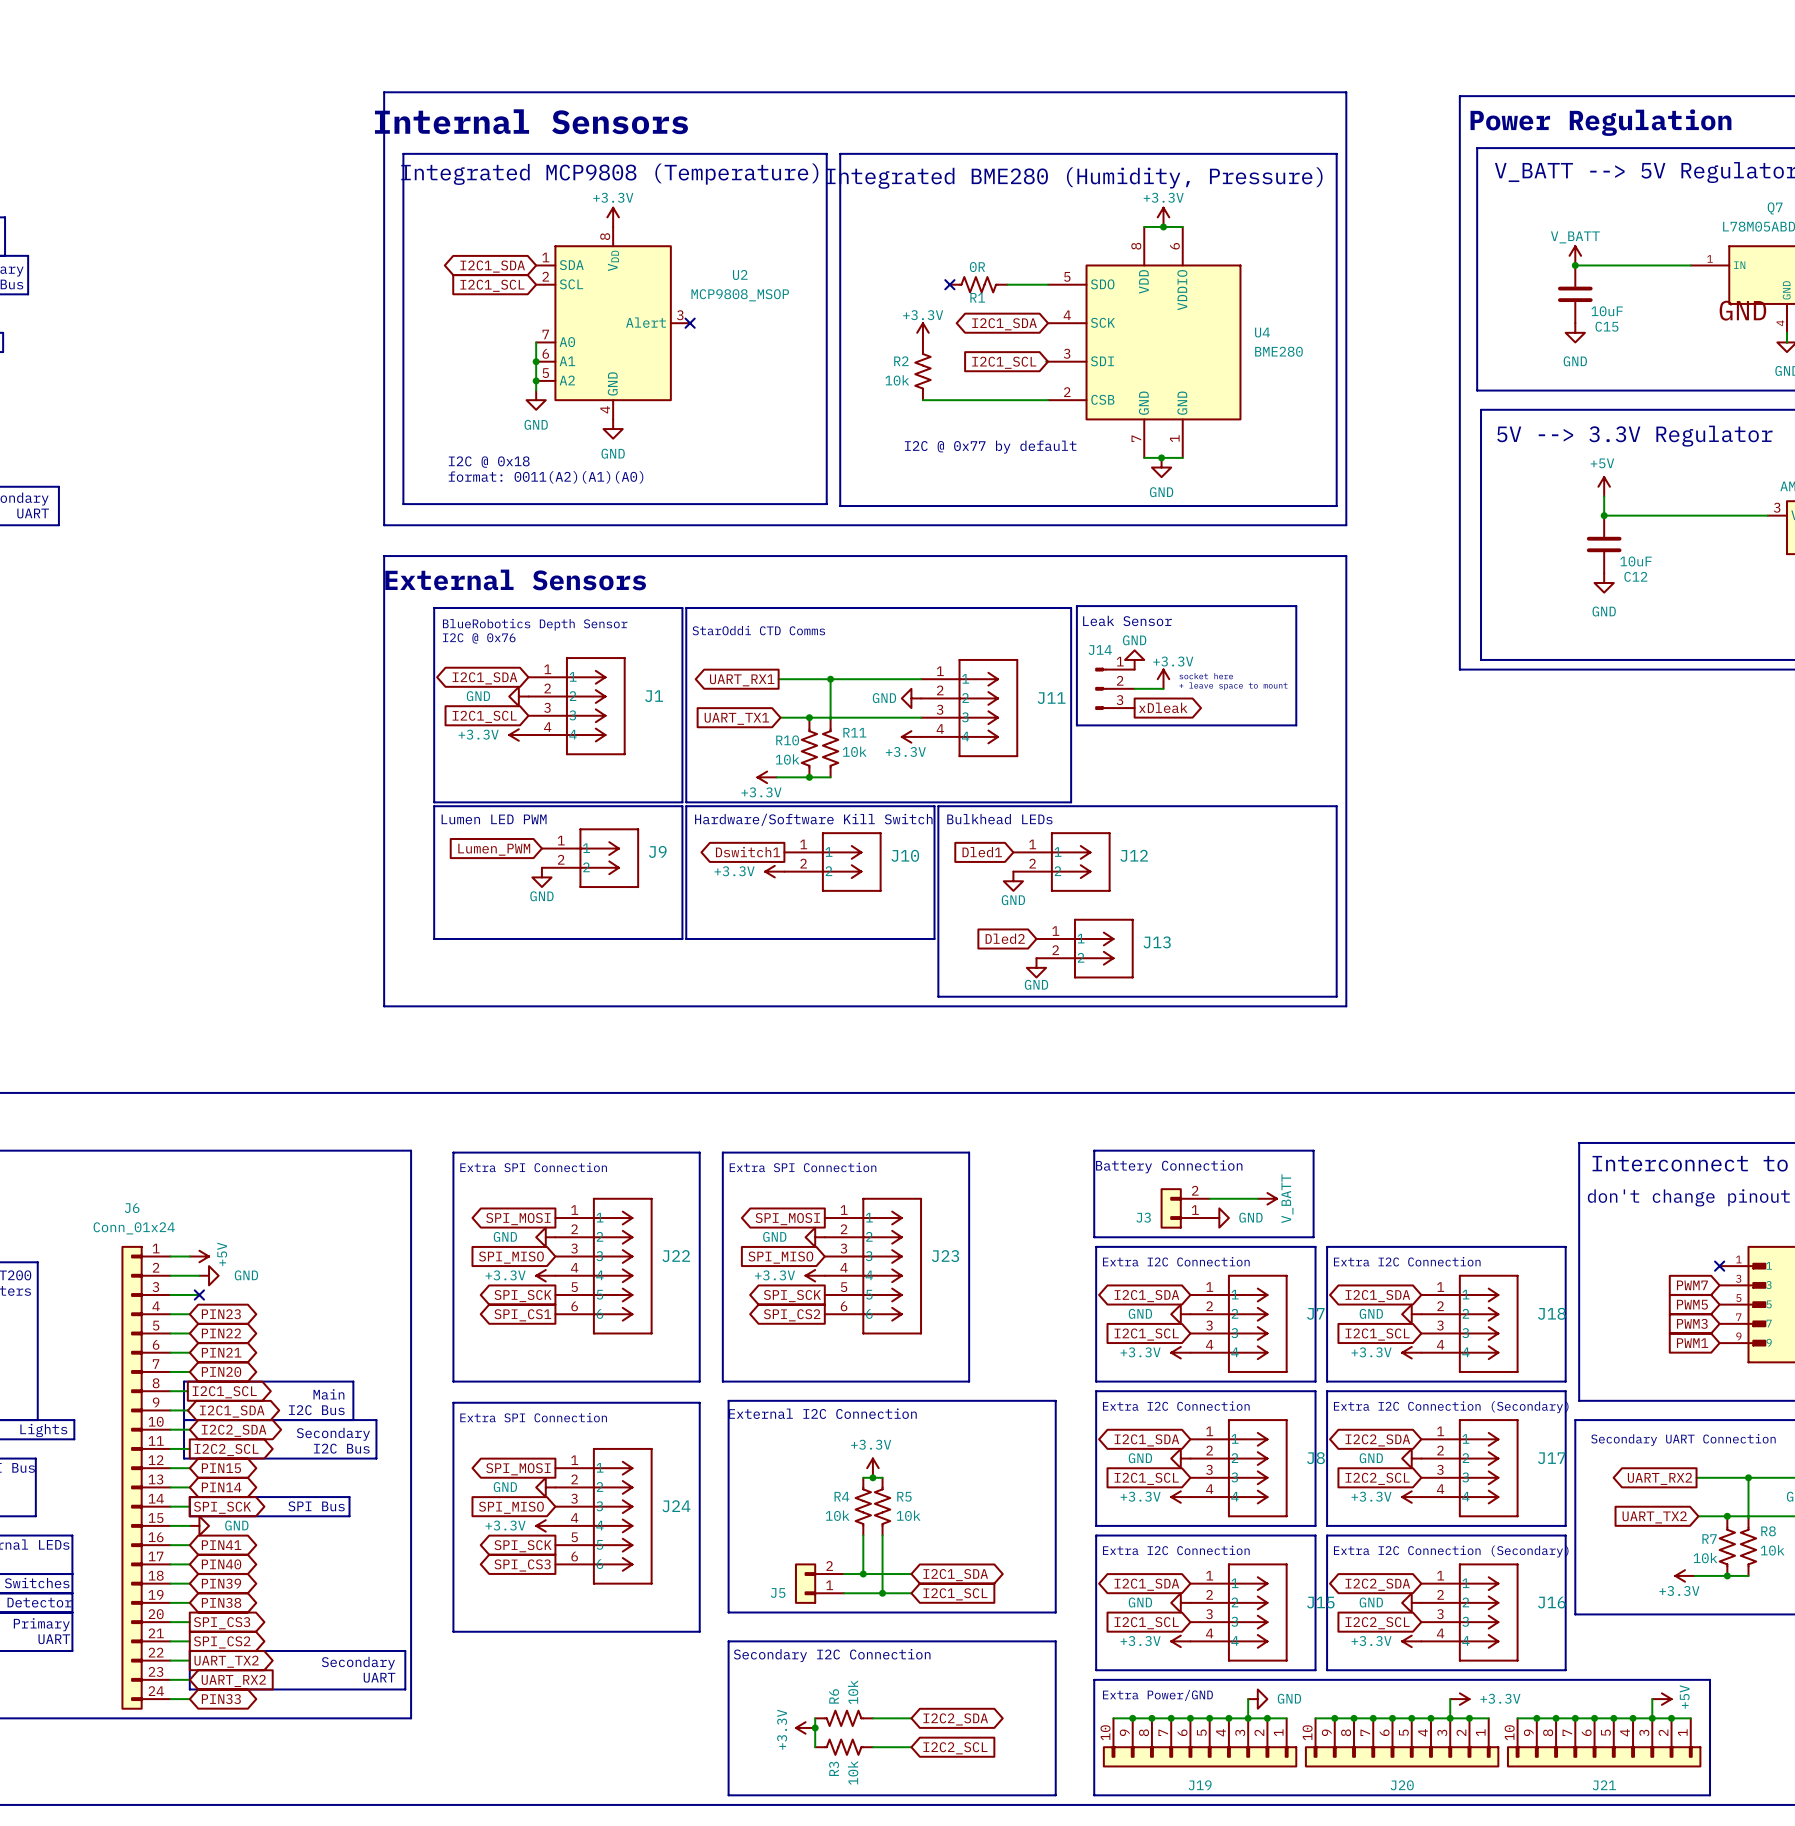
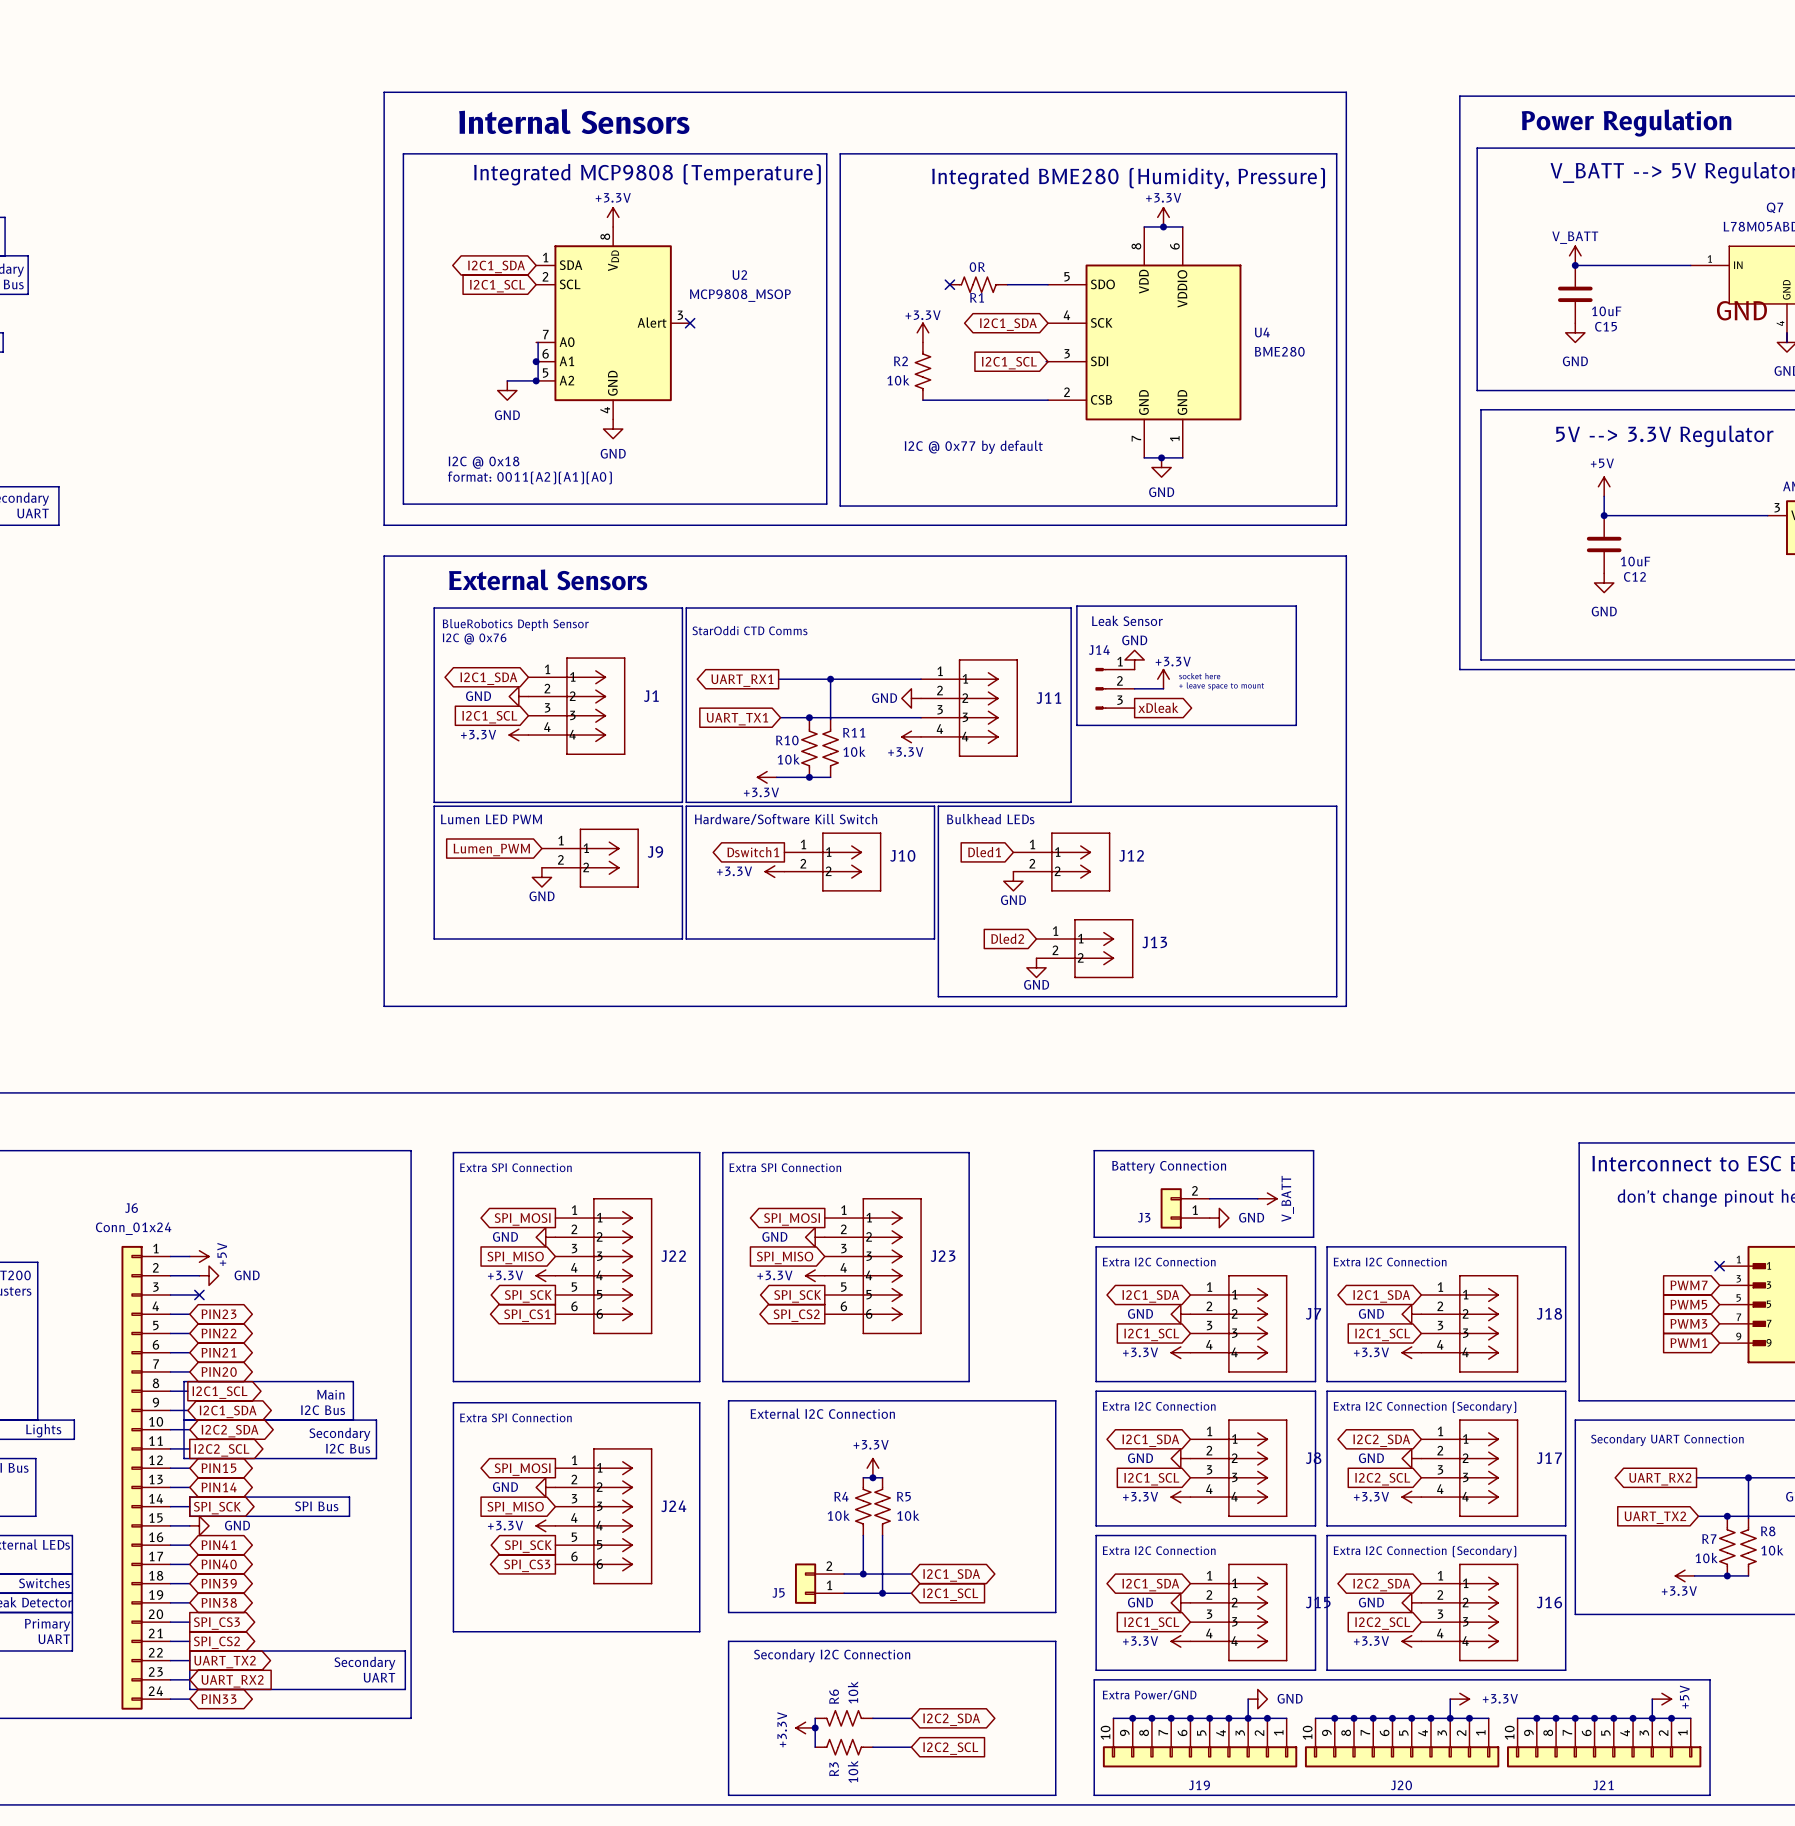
wire: (536, 342) (536, 390) -> none
wire: none -> (538, 342) (538, 380) (507, 380)
power symbol position: GND (536, 400) -> GND (507, 390)

